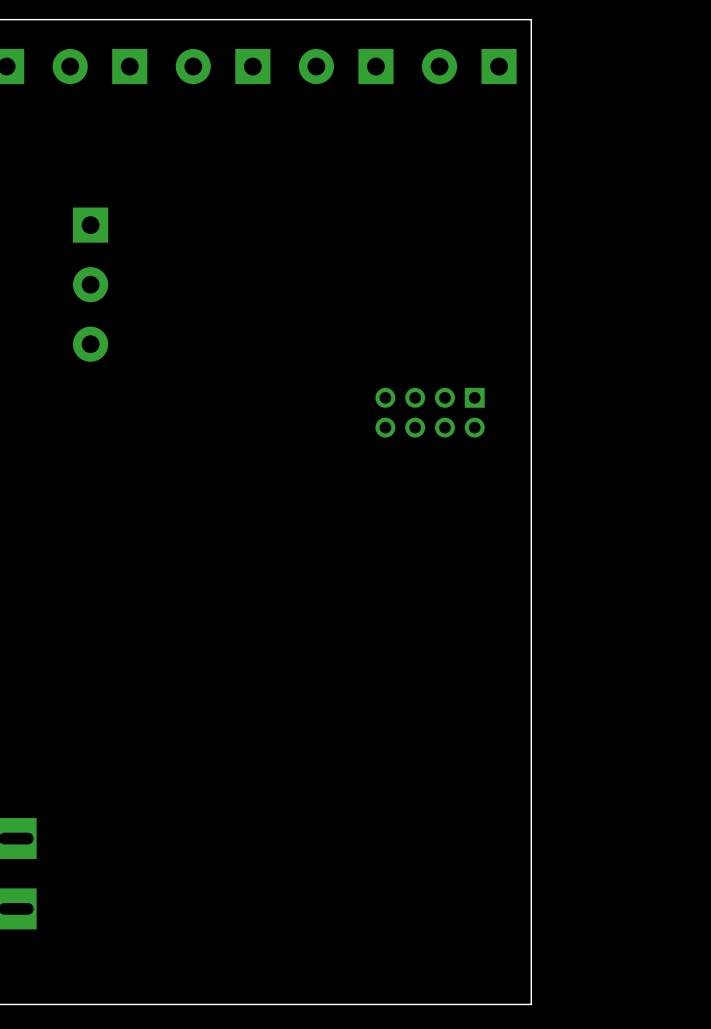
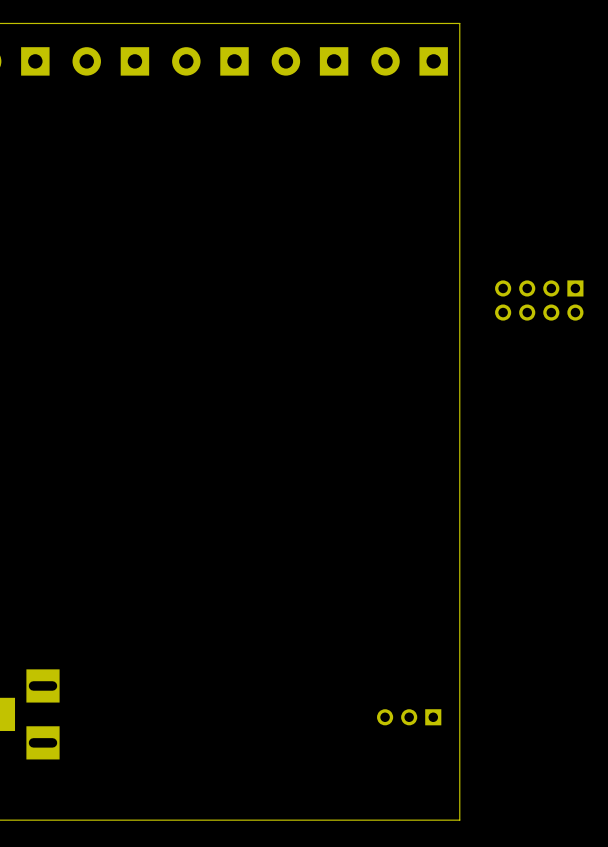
part: (90, 284) -> none
part position: (430, 412) -> (539, 300)
part: none -> (409, 717)

